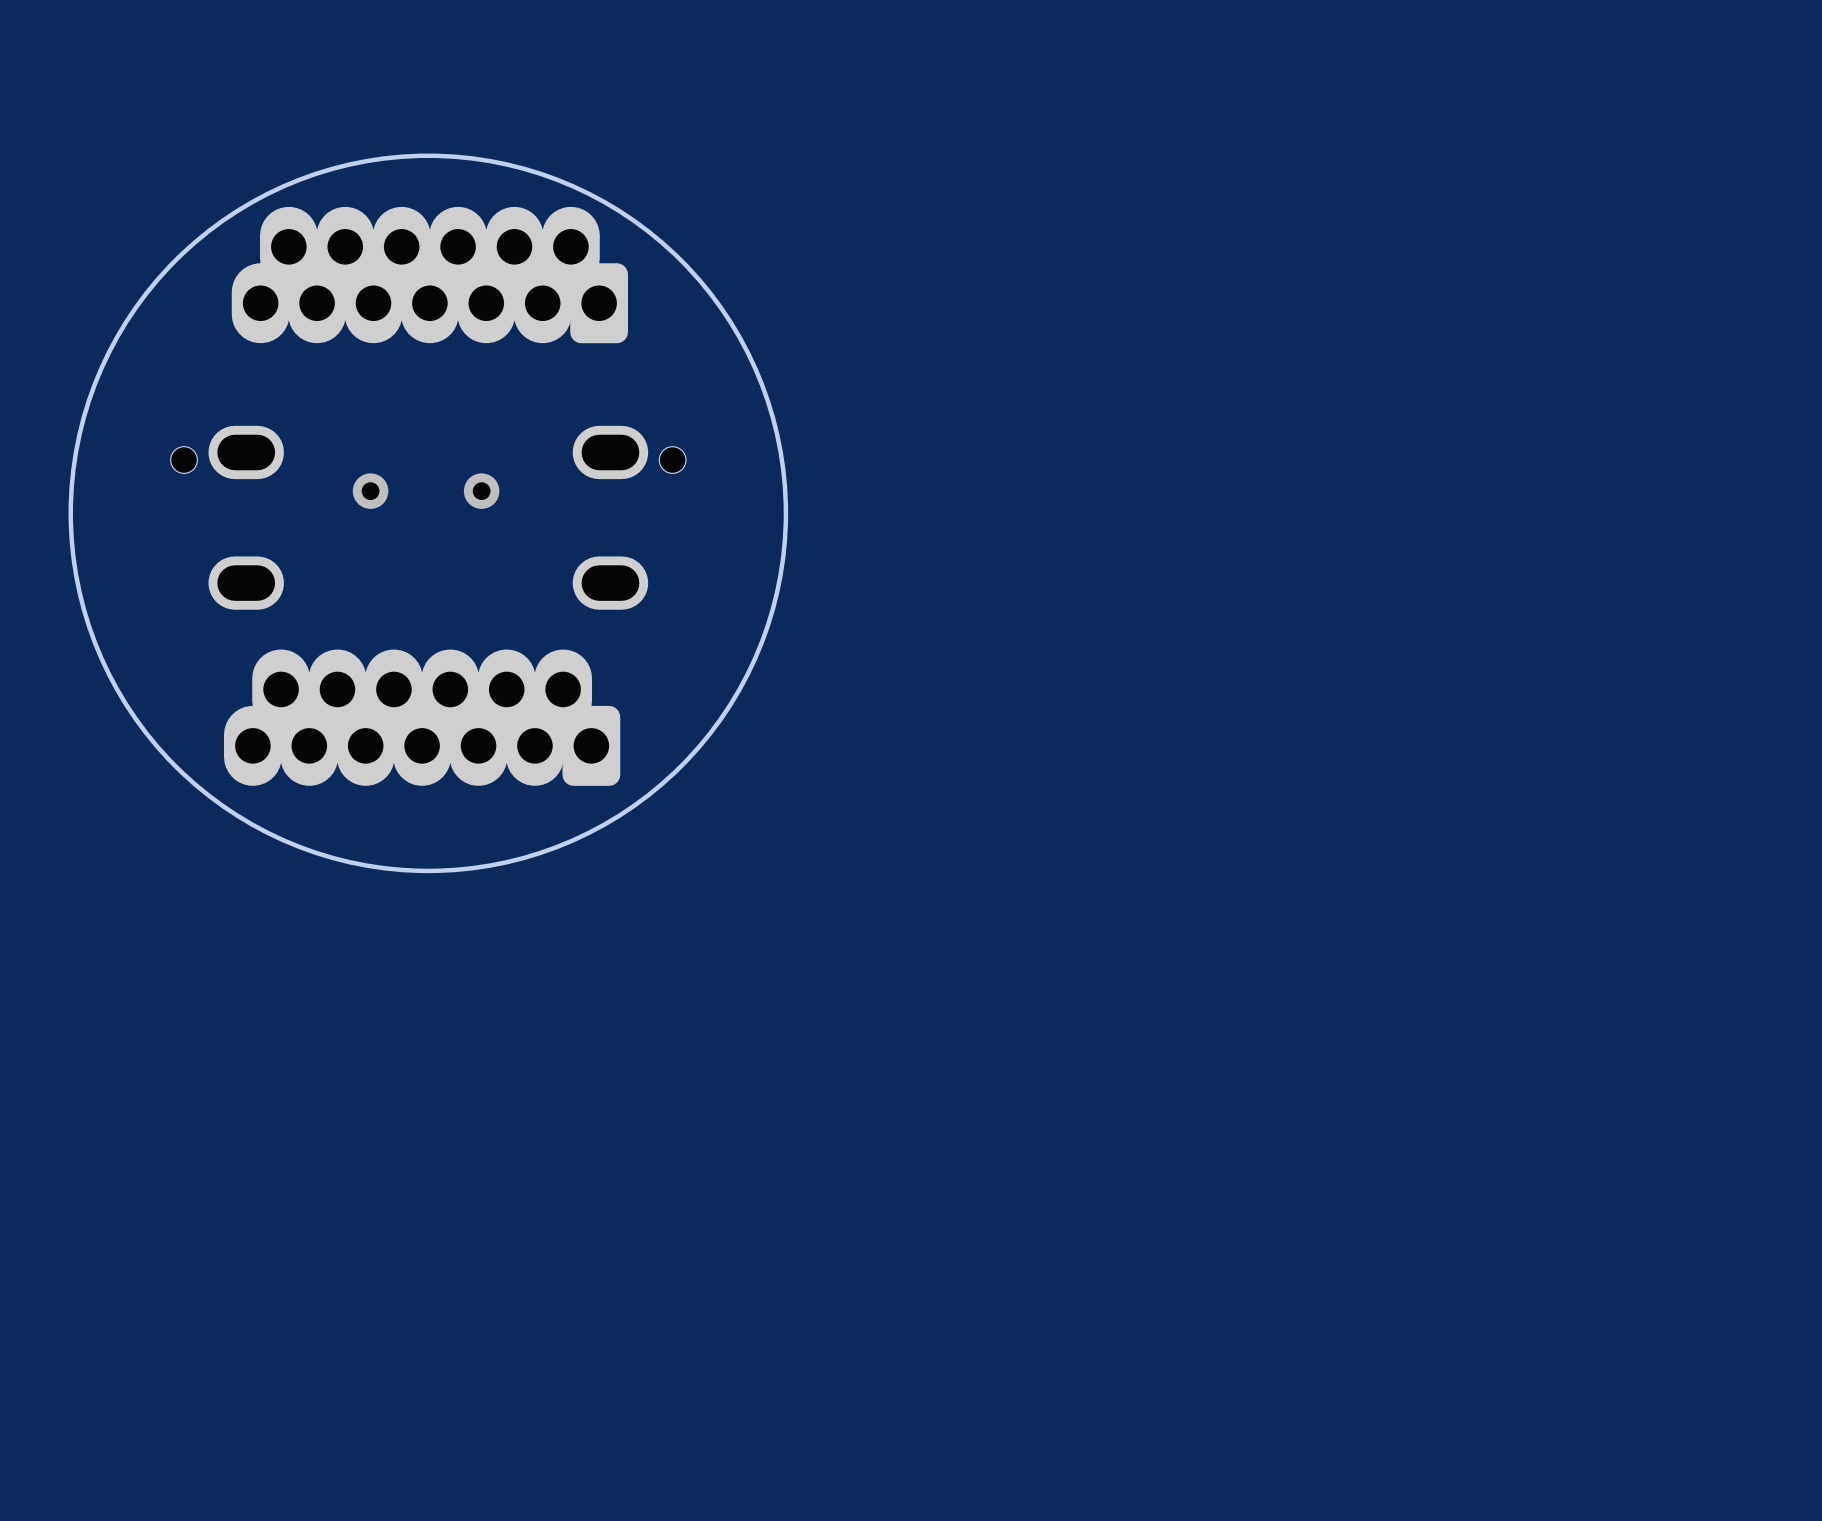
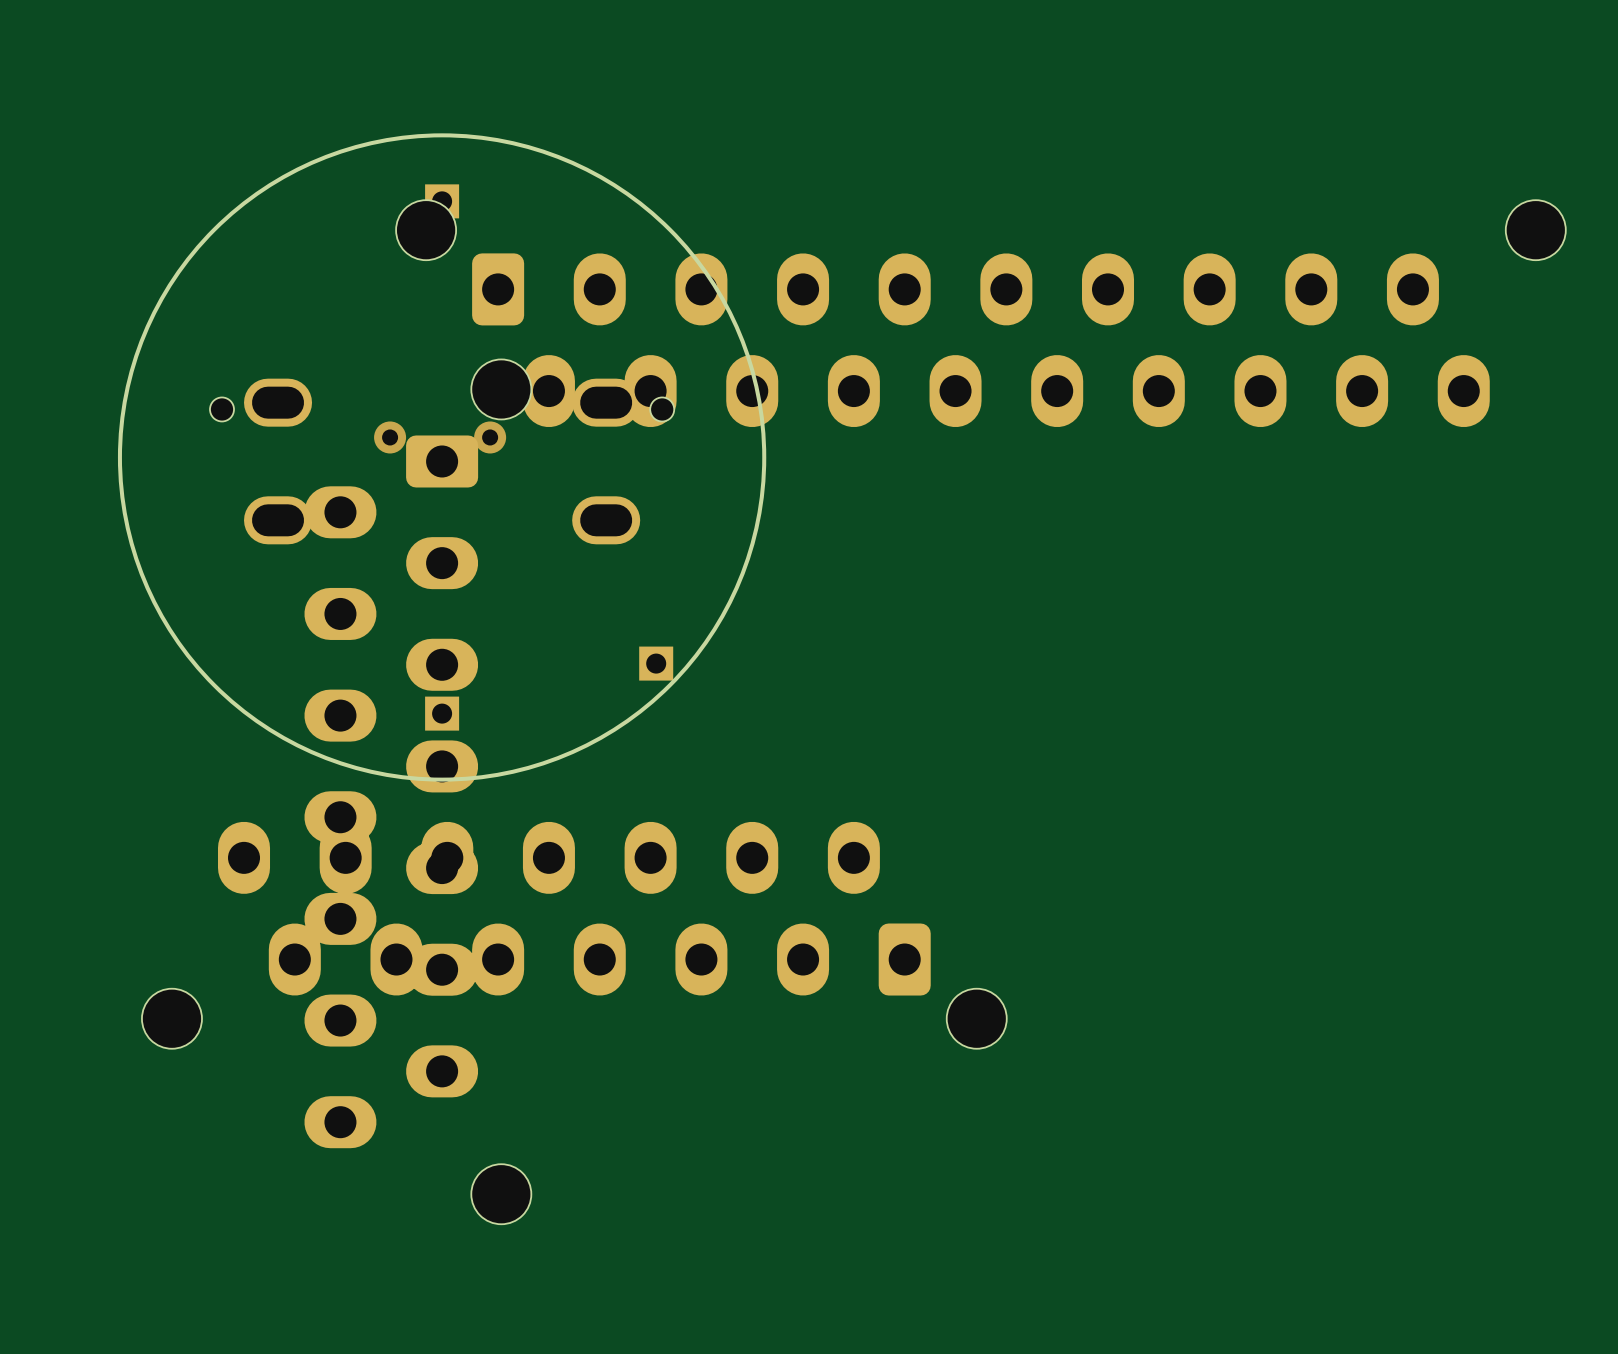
part: none -> (442, 201)
part: (429, 275) -> none
part: none -> (980, 313)
part: (422, 717) -> none
part: none -> (656, 663)
part: none -> (442, 713)
part: none -> (417, 791)
part: none -> (574, 935)

